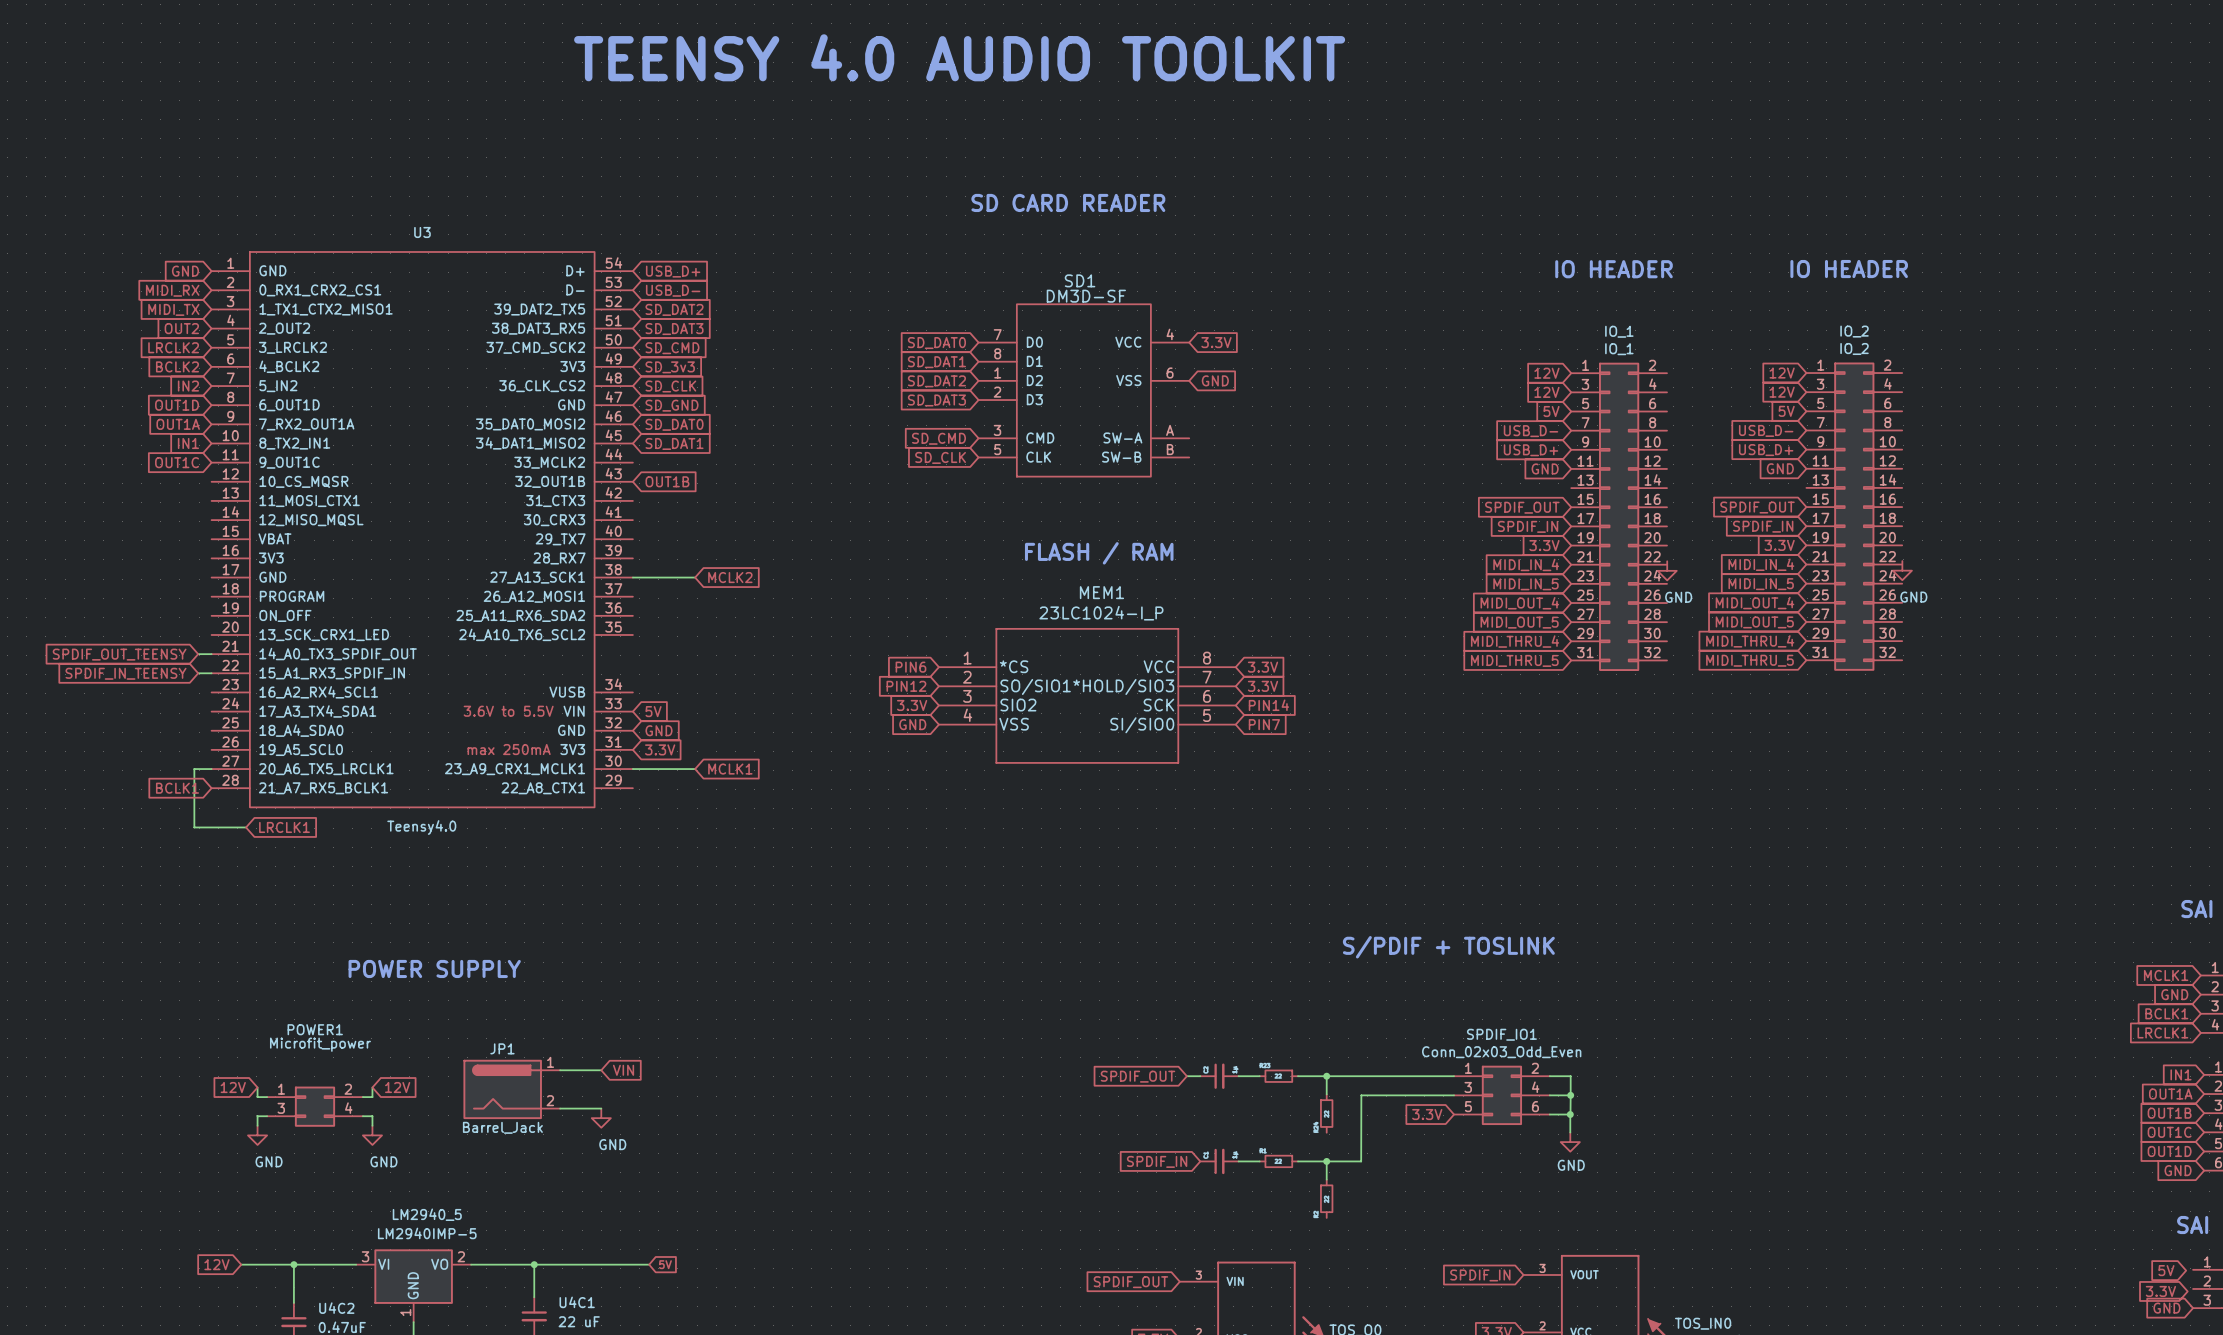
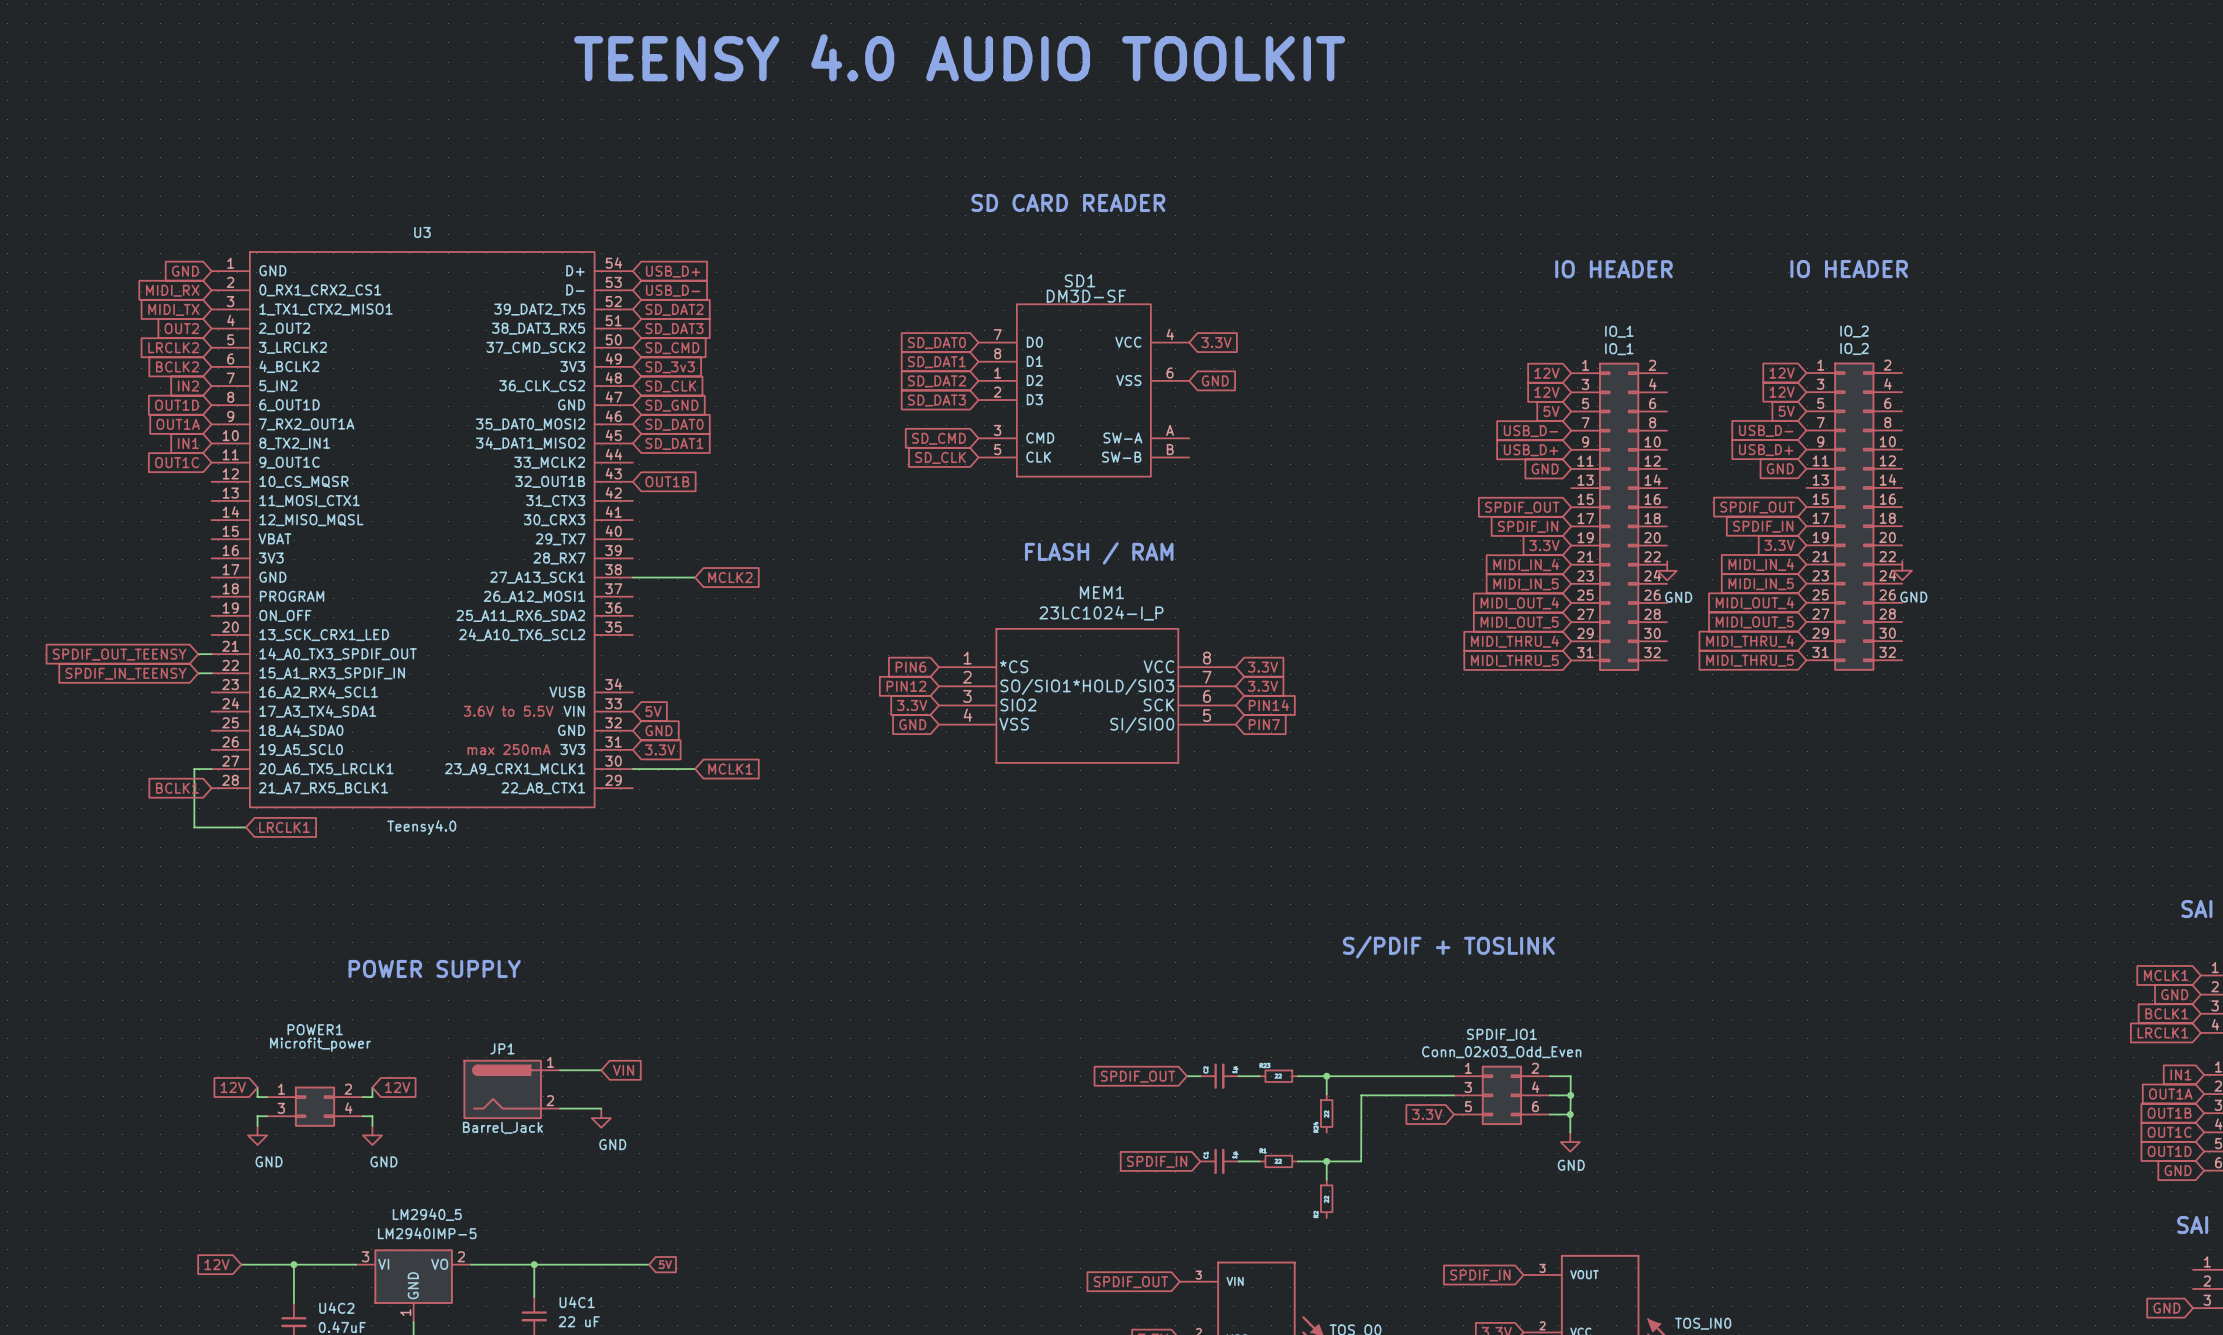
global label: 5V (2166, 1270) -> none
global label: 3.3V (2160, 1291) -> none

